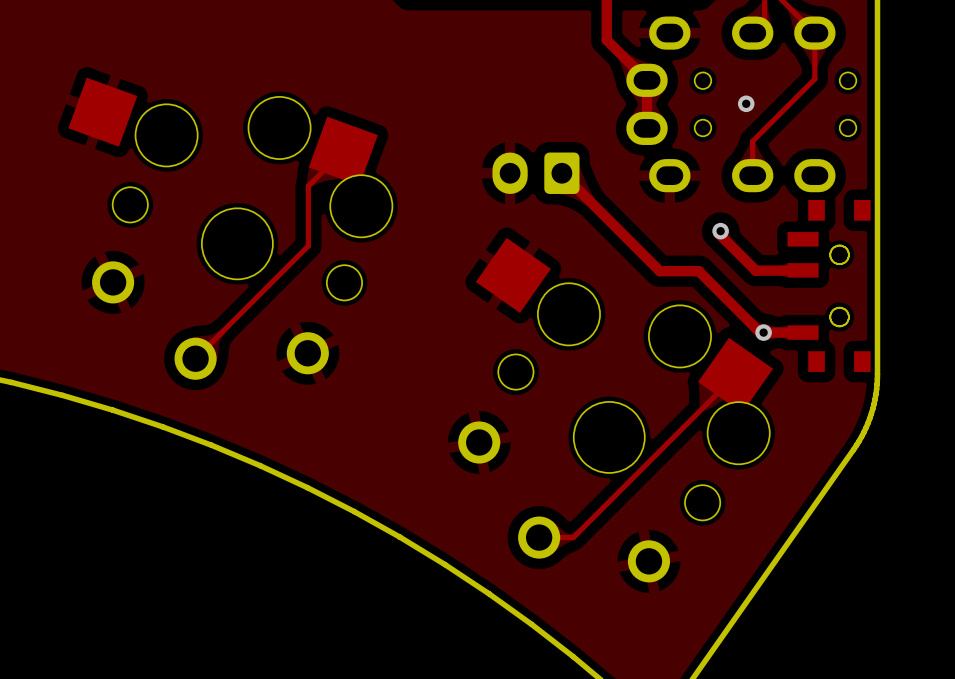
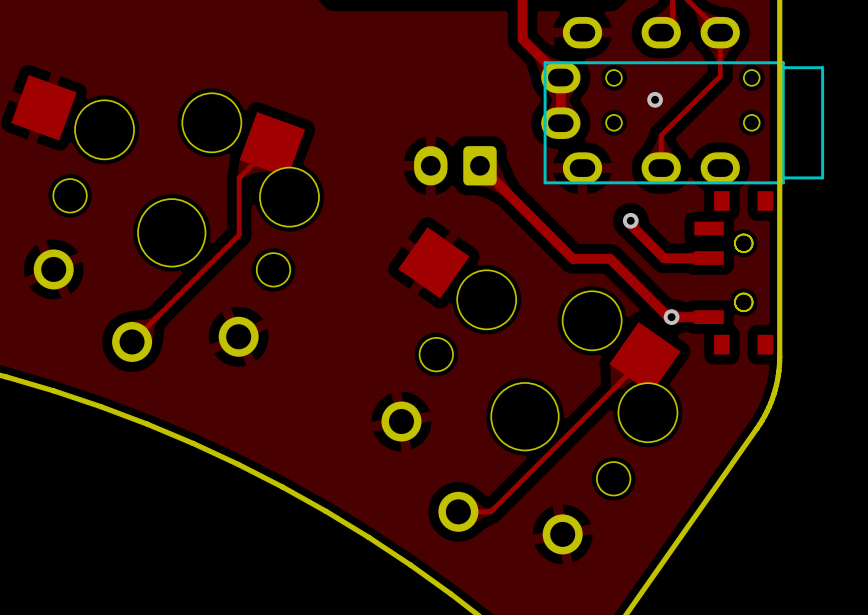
part: (741, 104) -> none
part: none -> (682, 100)

